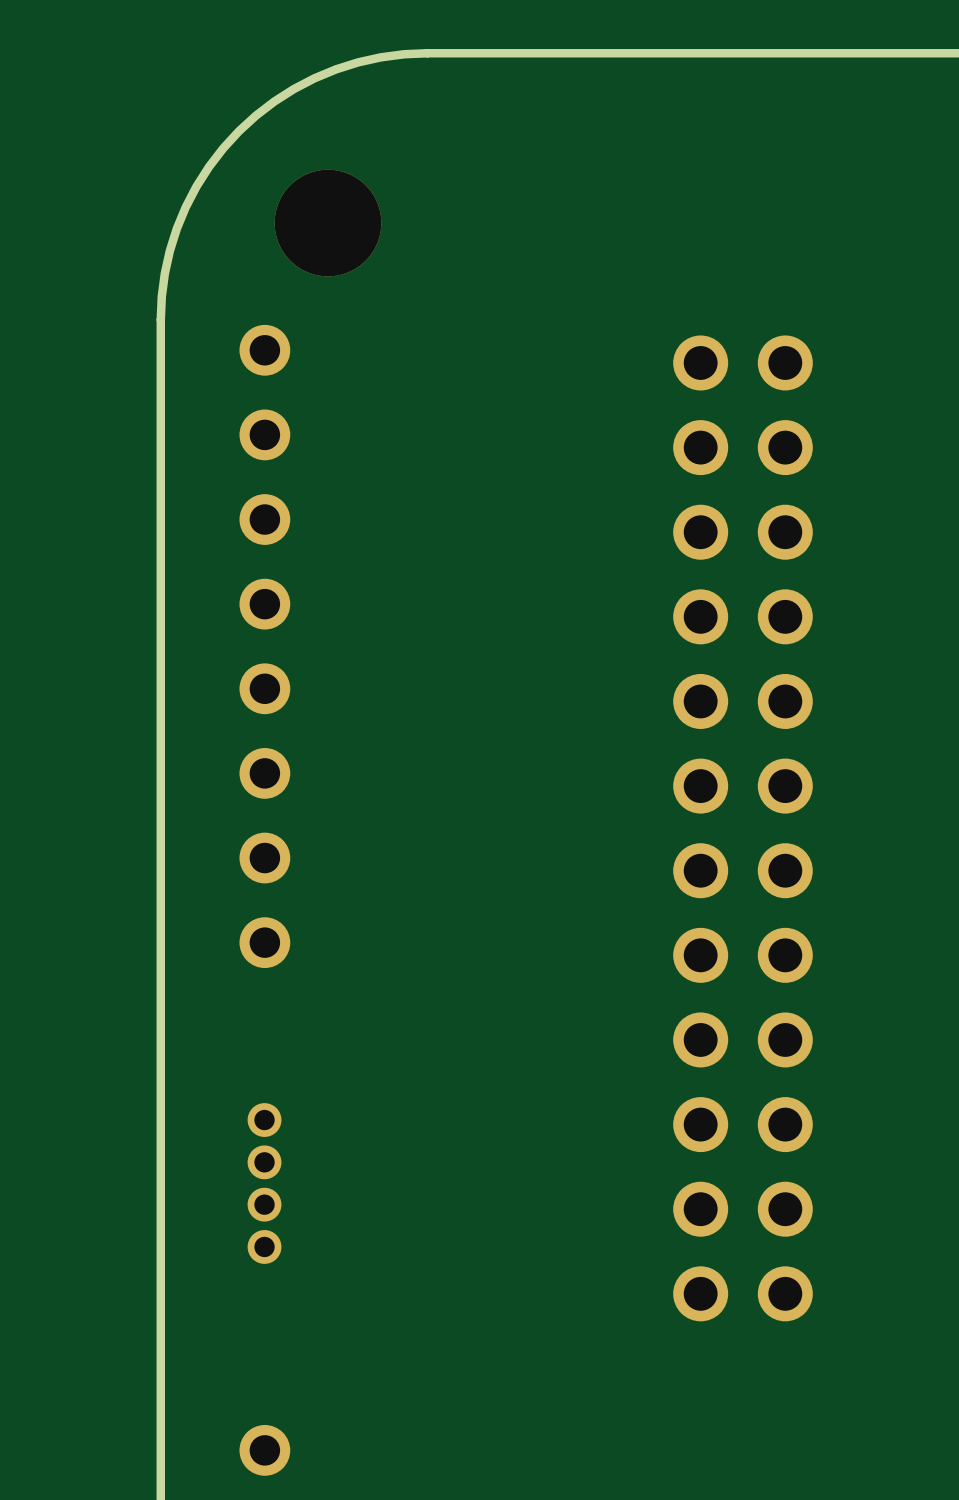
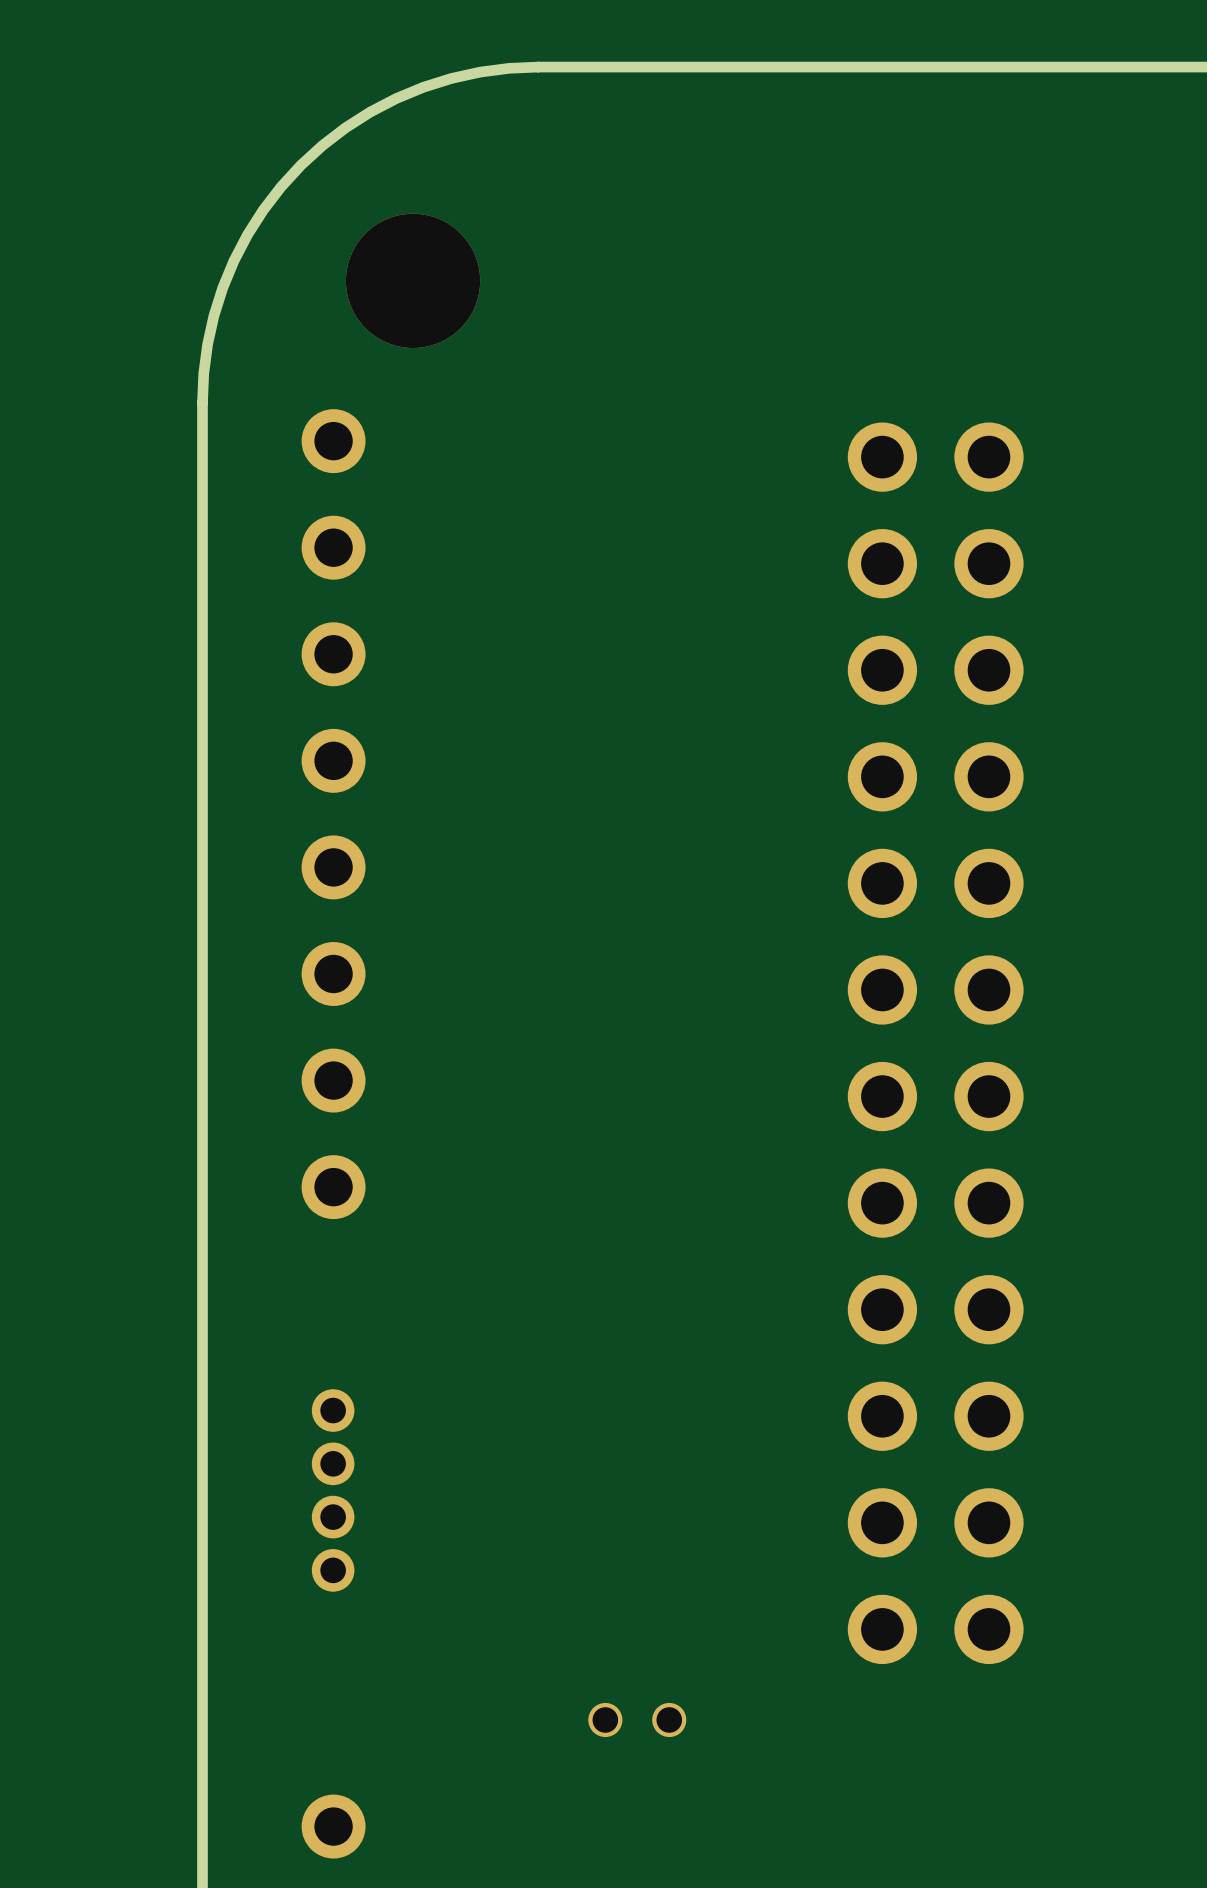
part: none -> (637, 1719)

